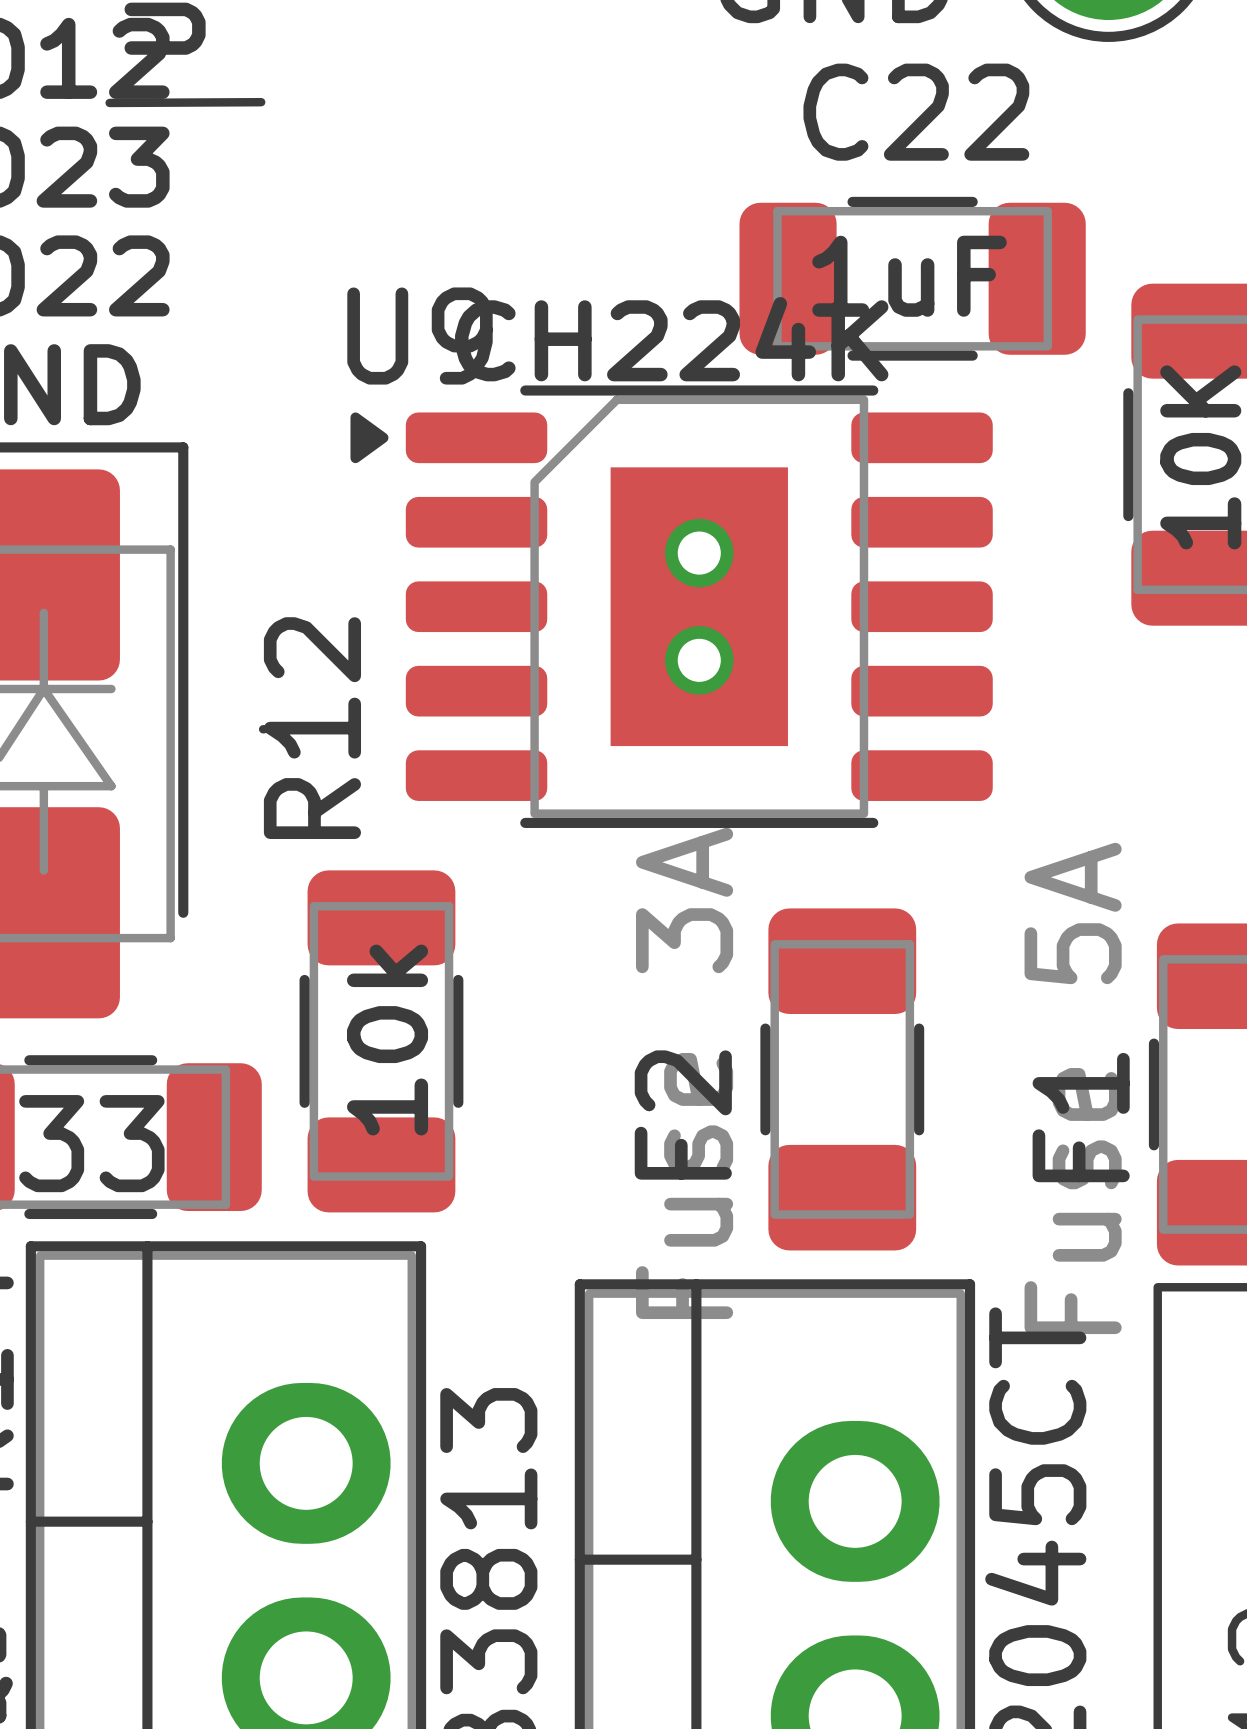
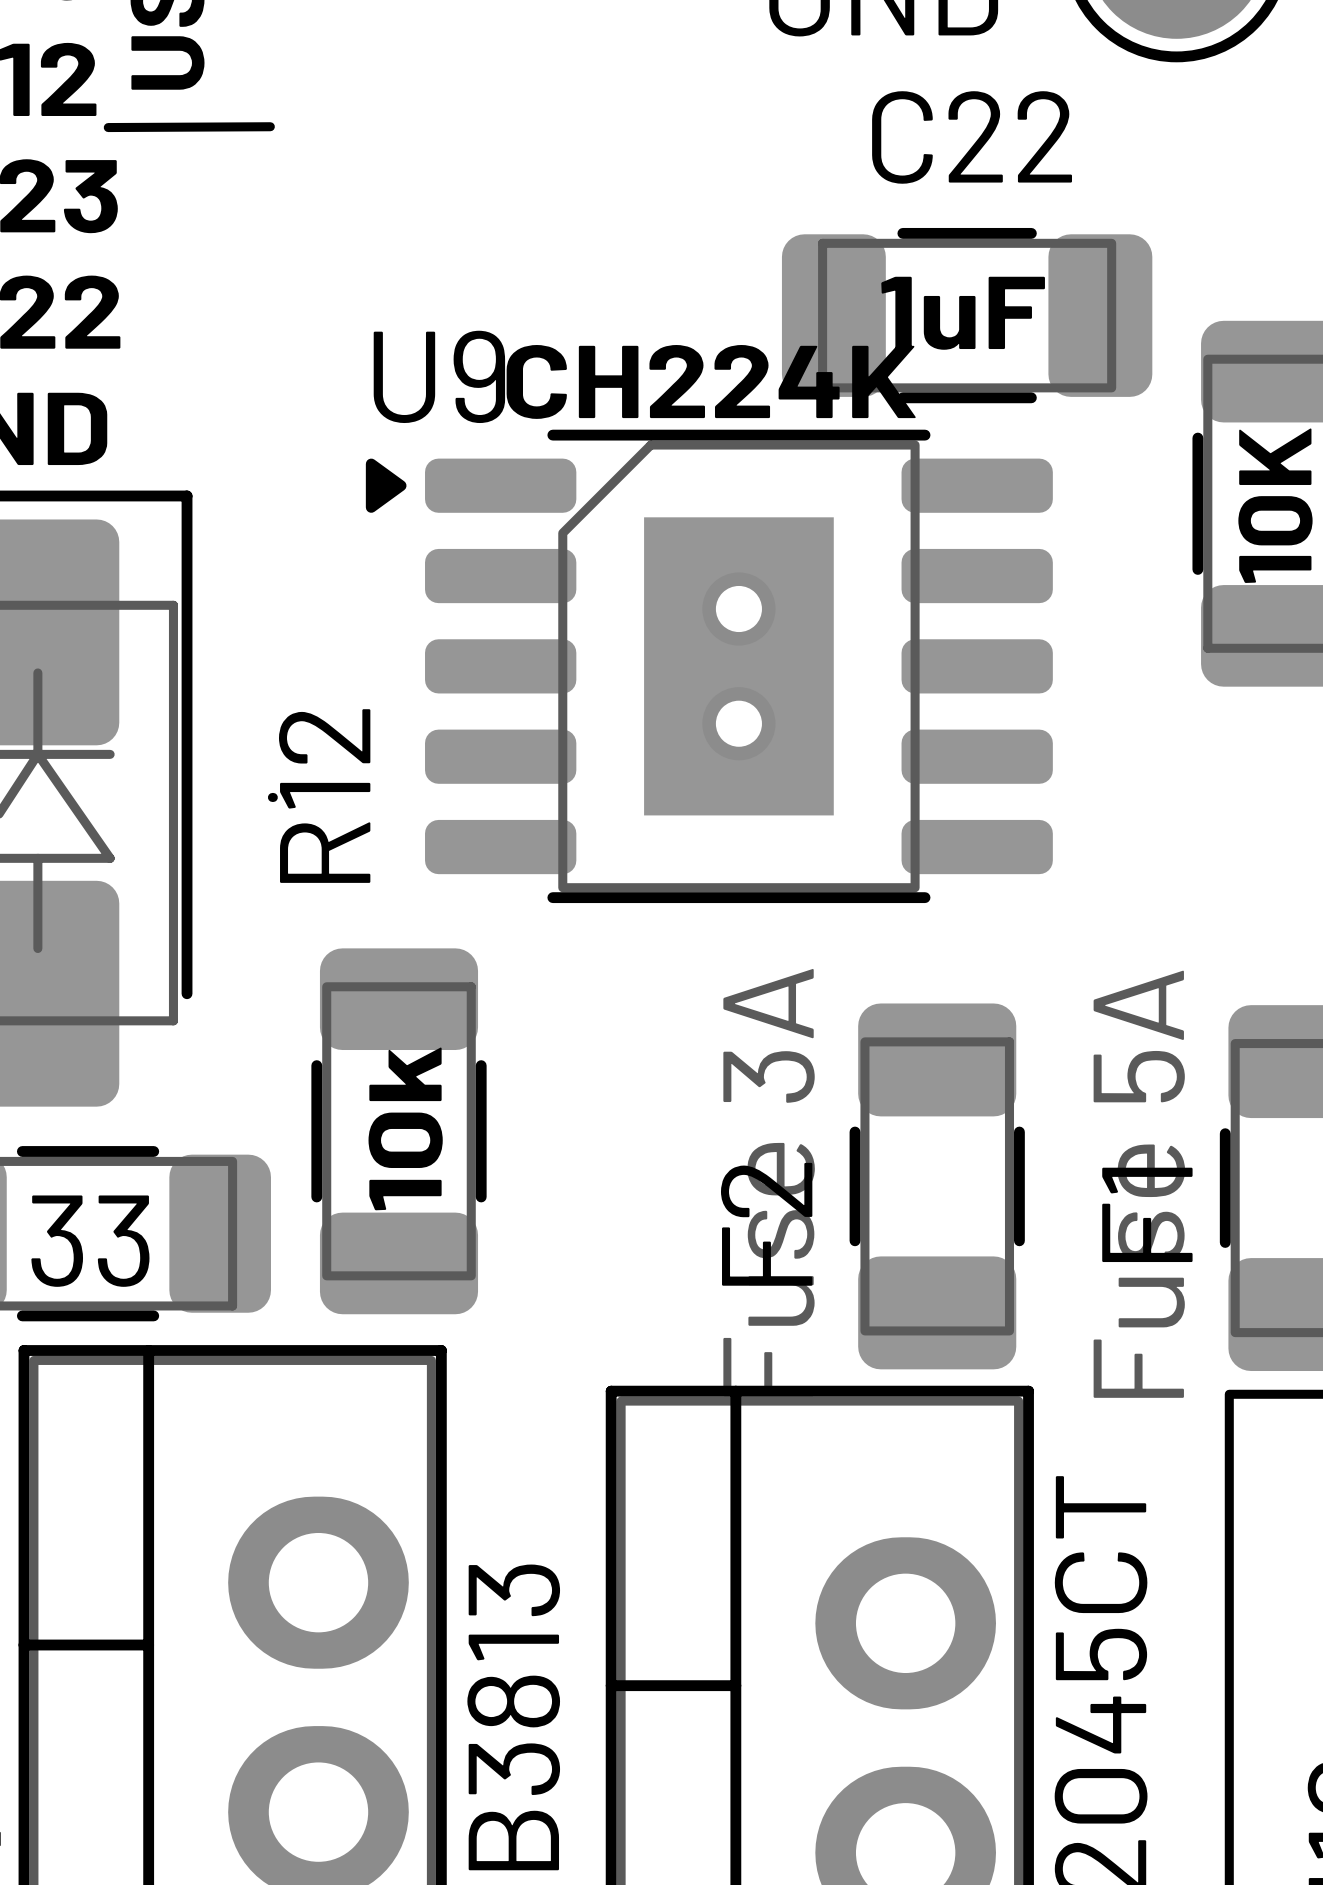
F2 position: (842, 1079) -> (937, 1186)

